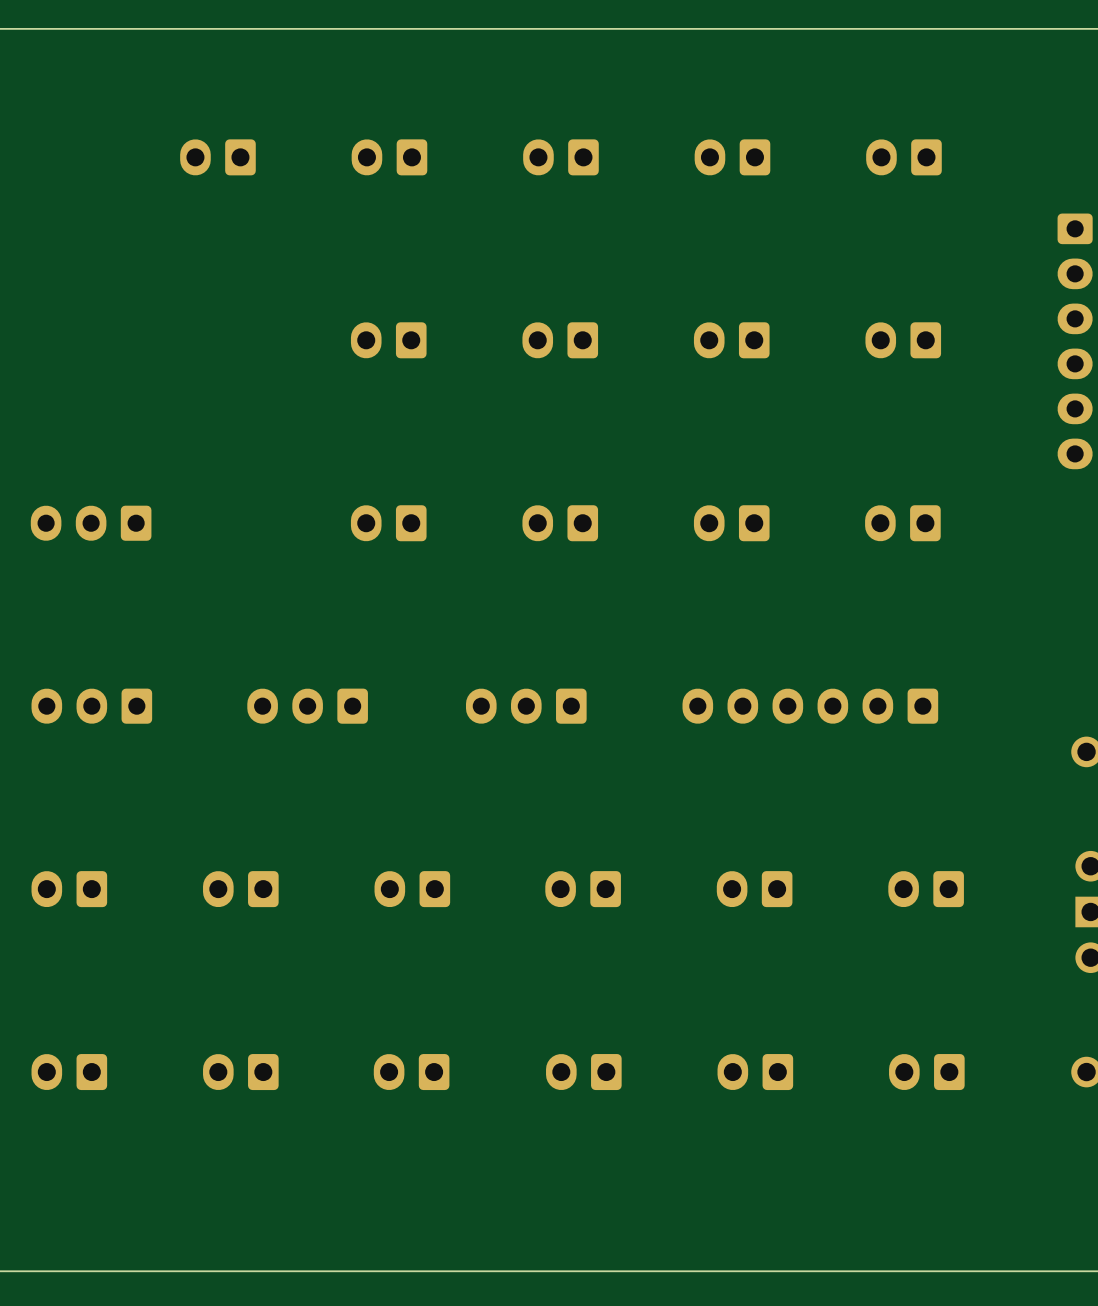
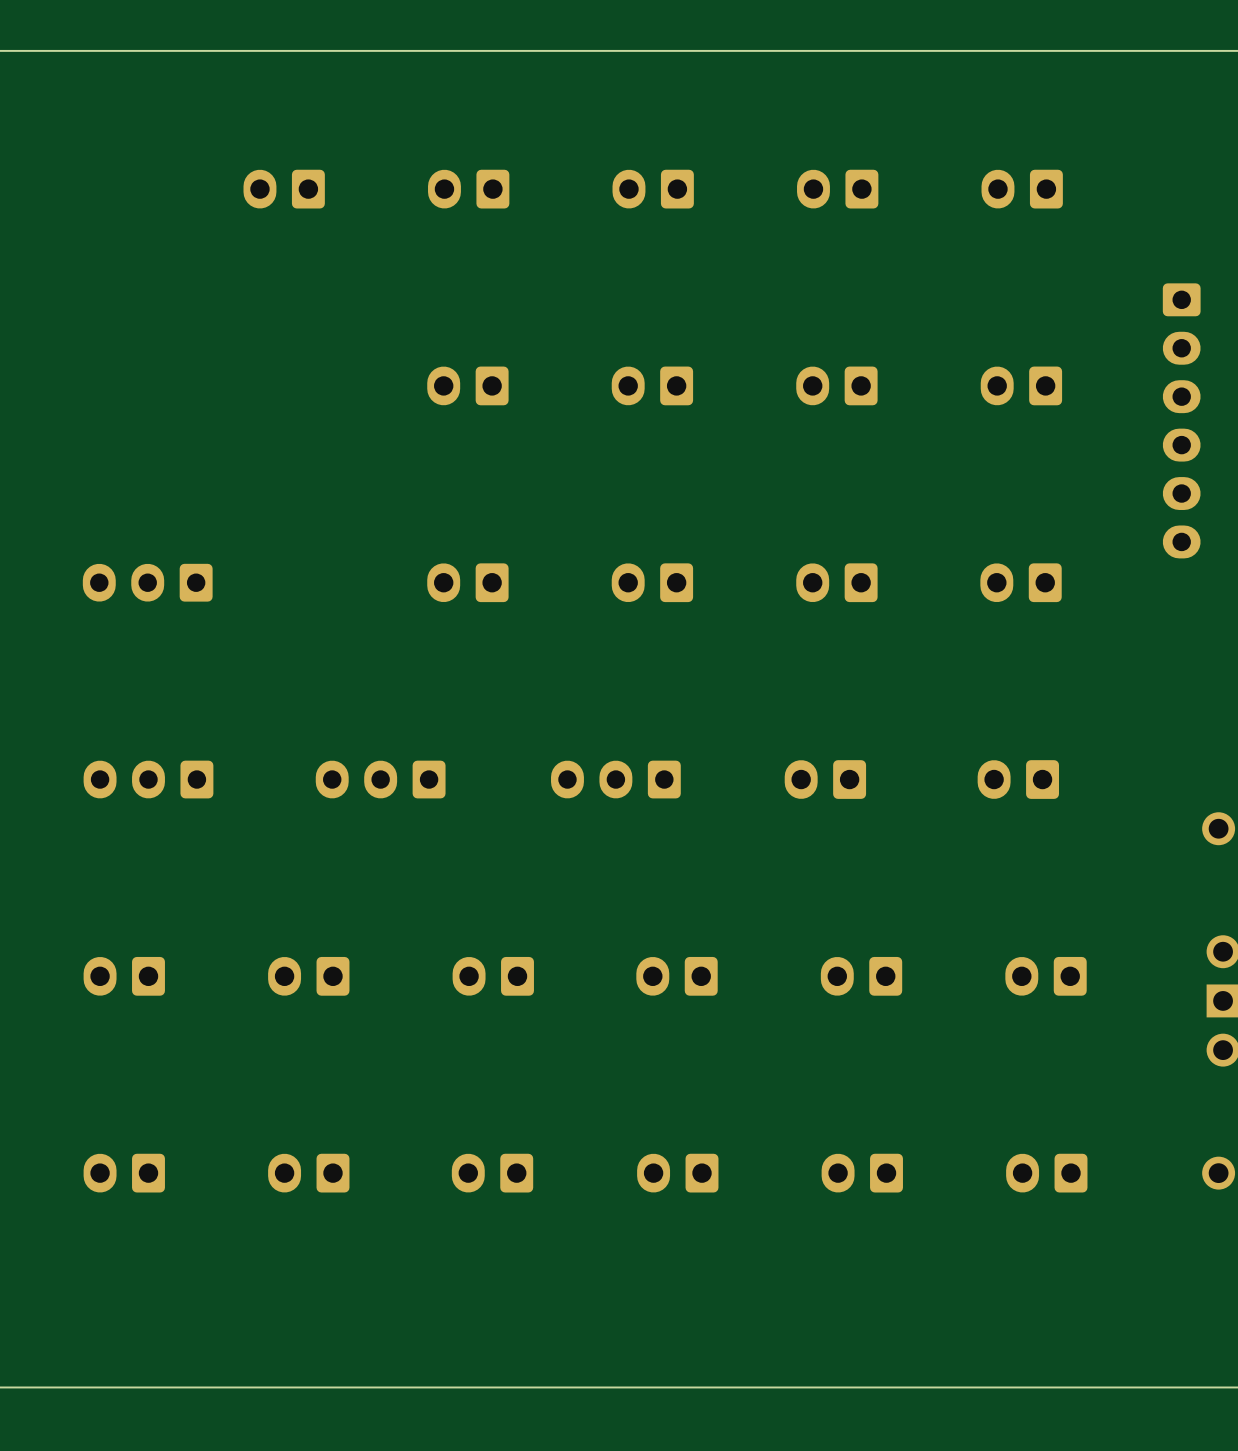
part position: (1075, 341) -> (1181, 420)
part: none -> (825, 779)
part: (810, 706) -> none
part: none -> (1018, 779)

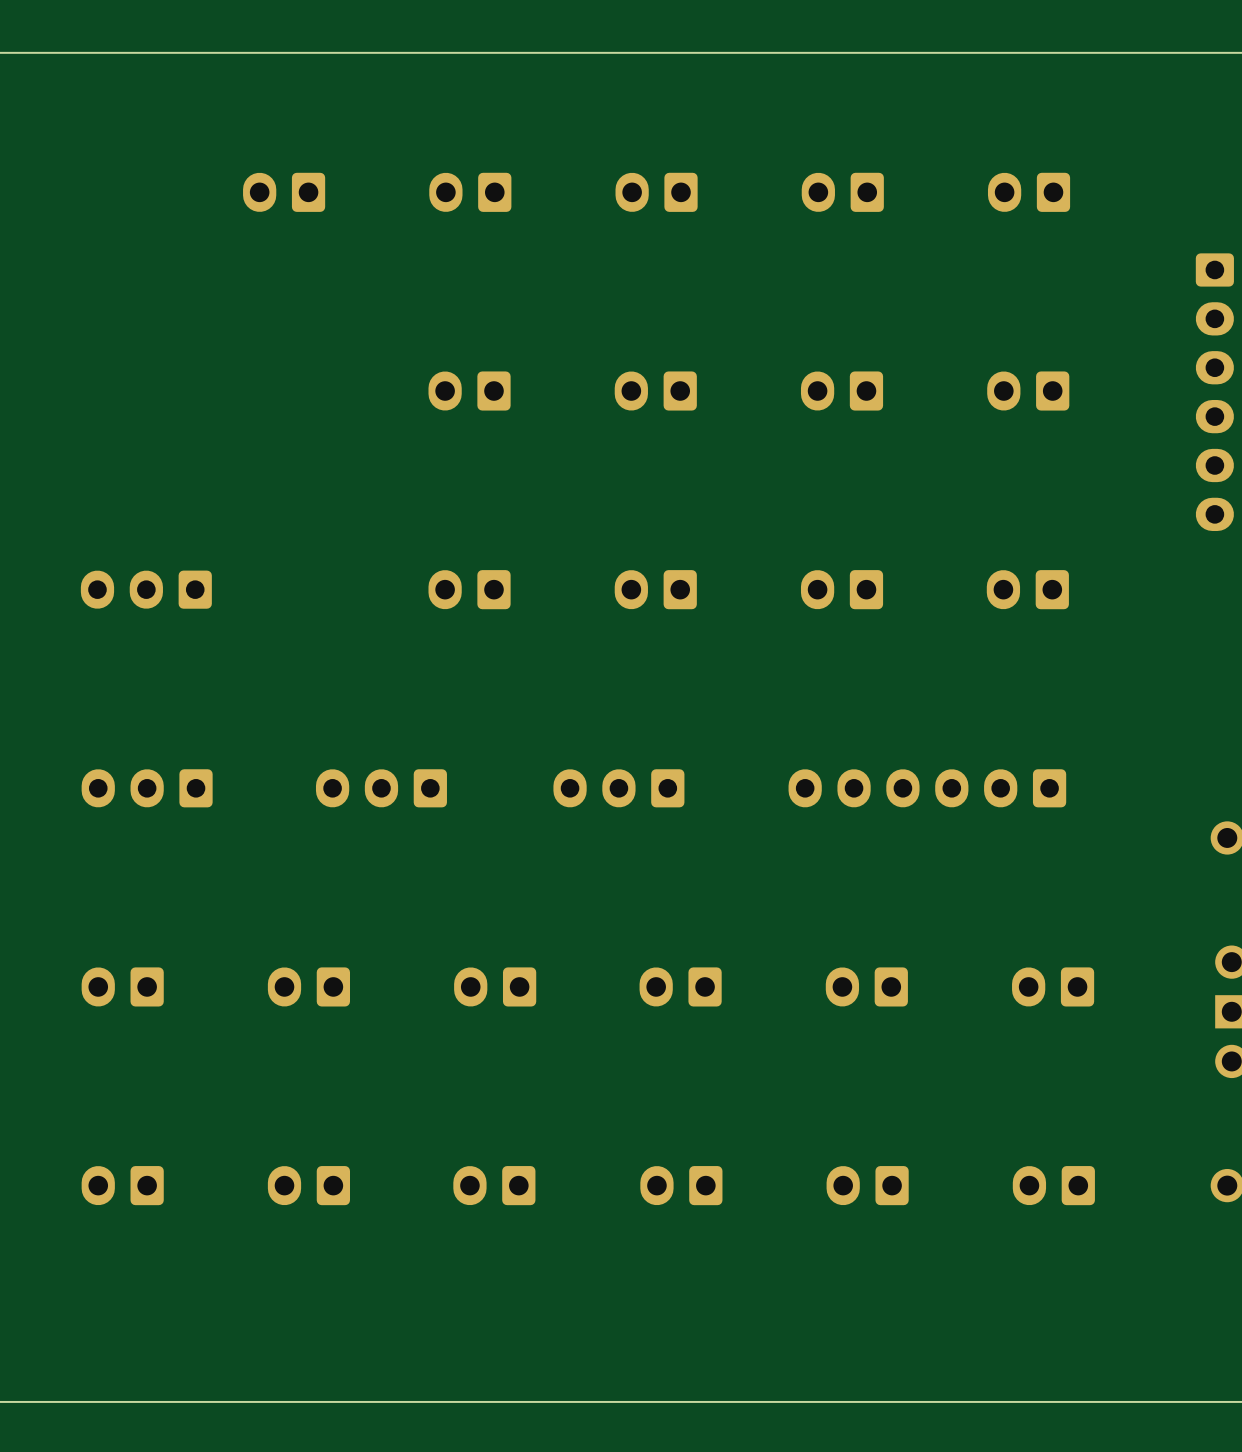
part position: (1181, 420) -> (1214, 392)
part: (825, 779) -> none
part: none -> (927, 788)
part: (1018, 779) -> none

